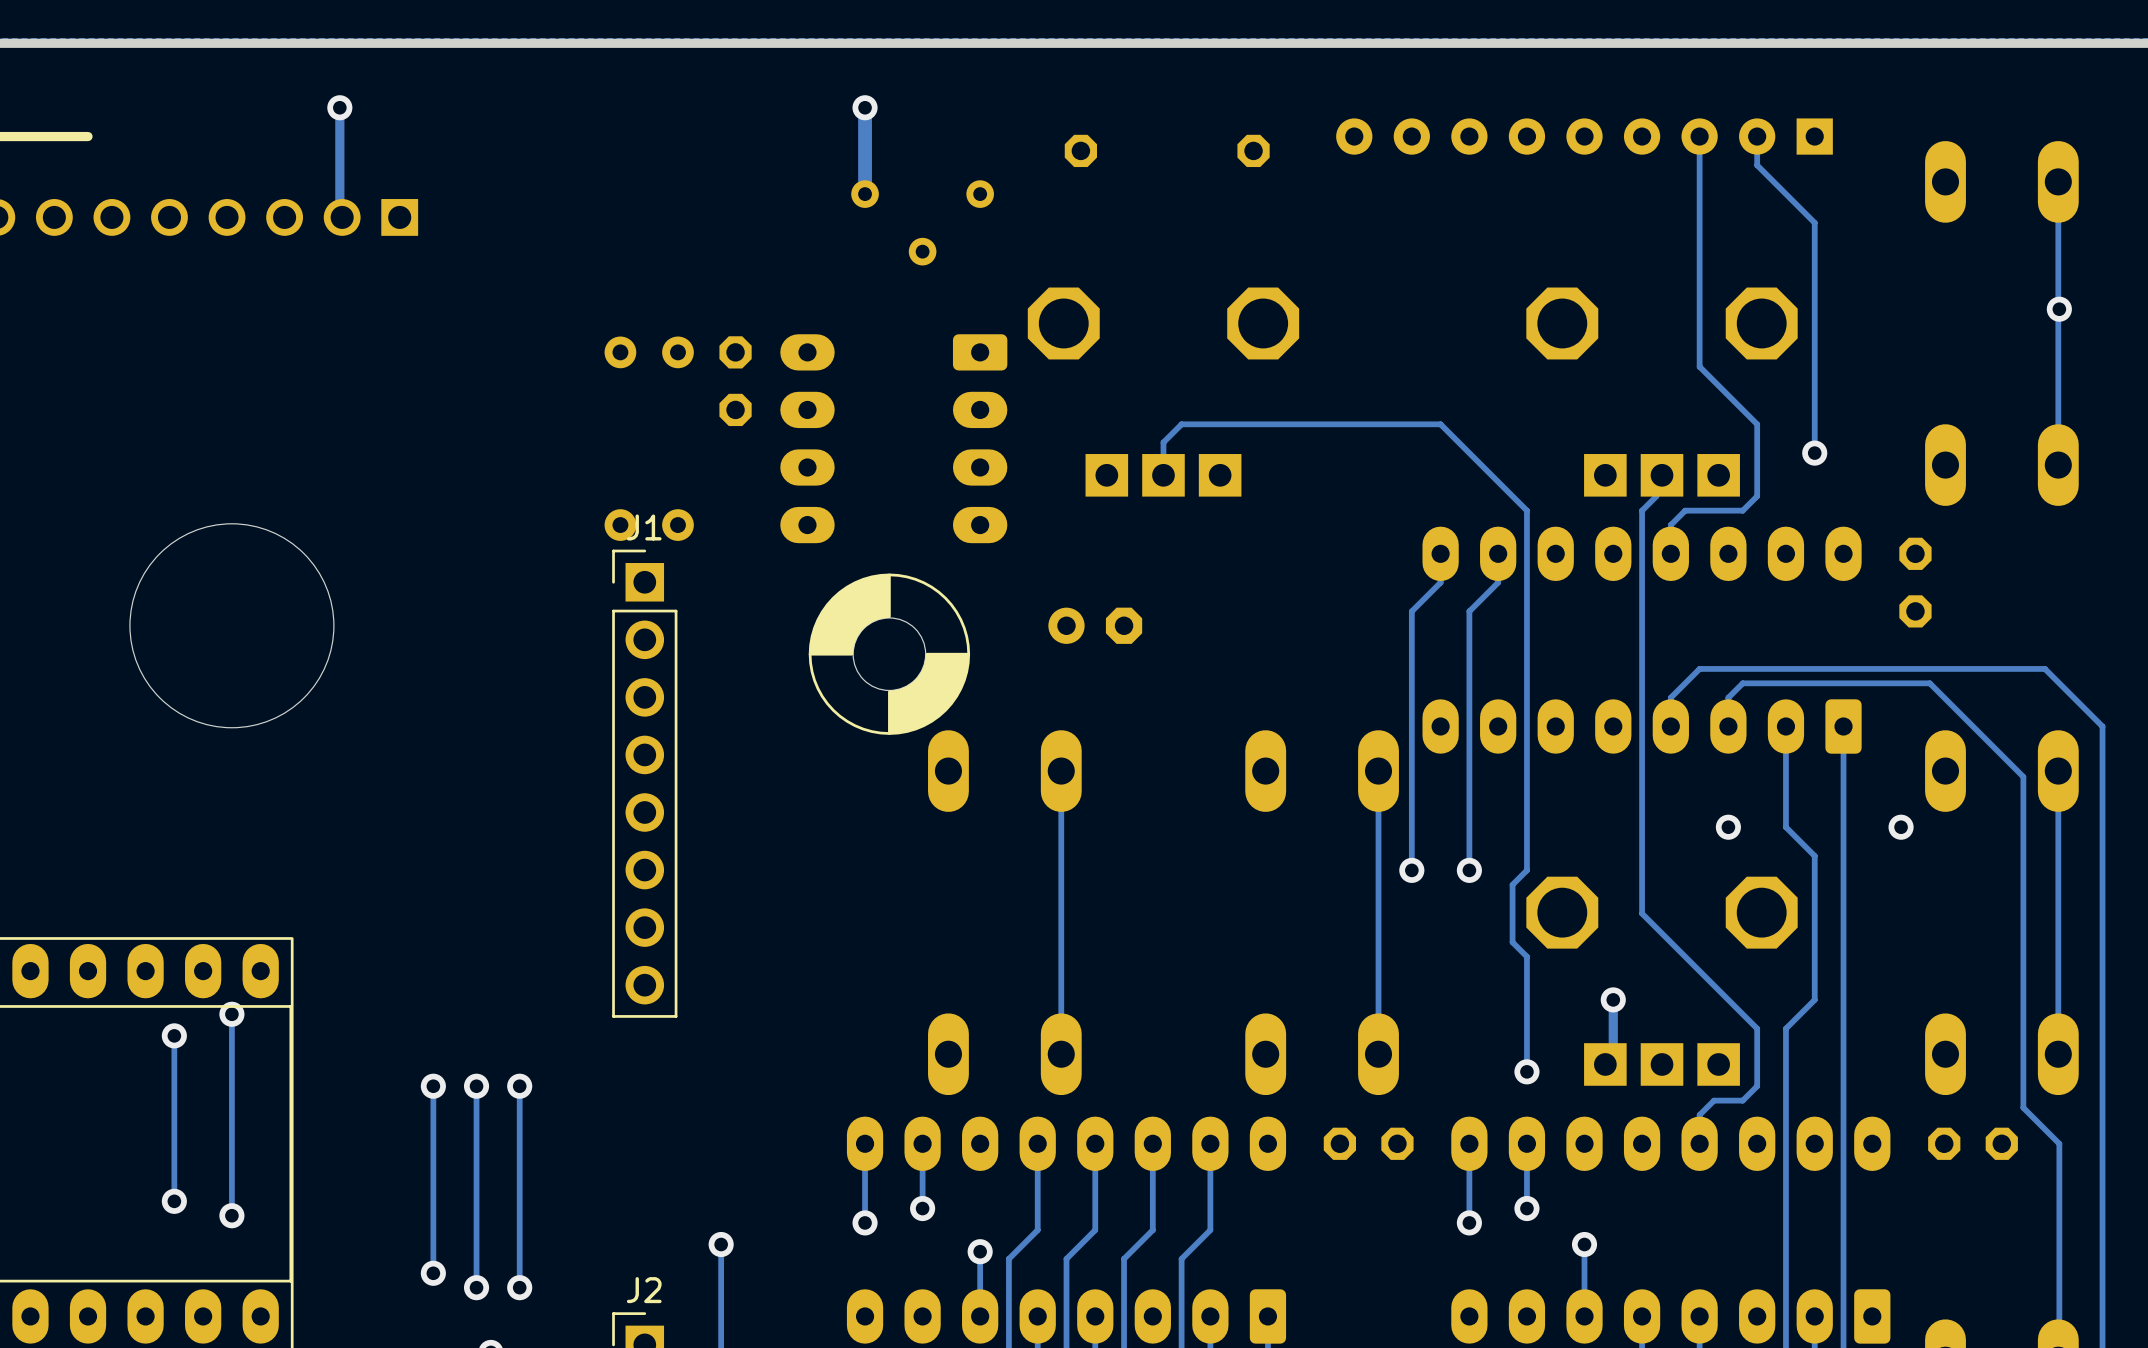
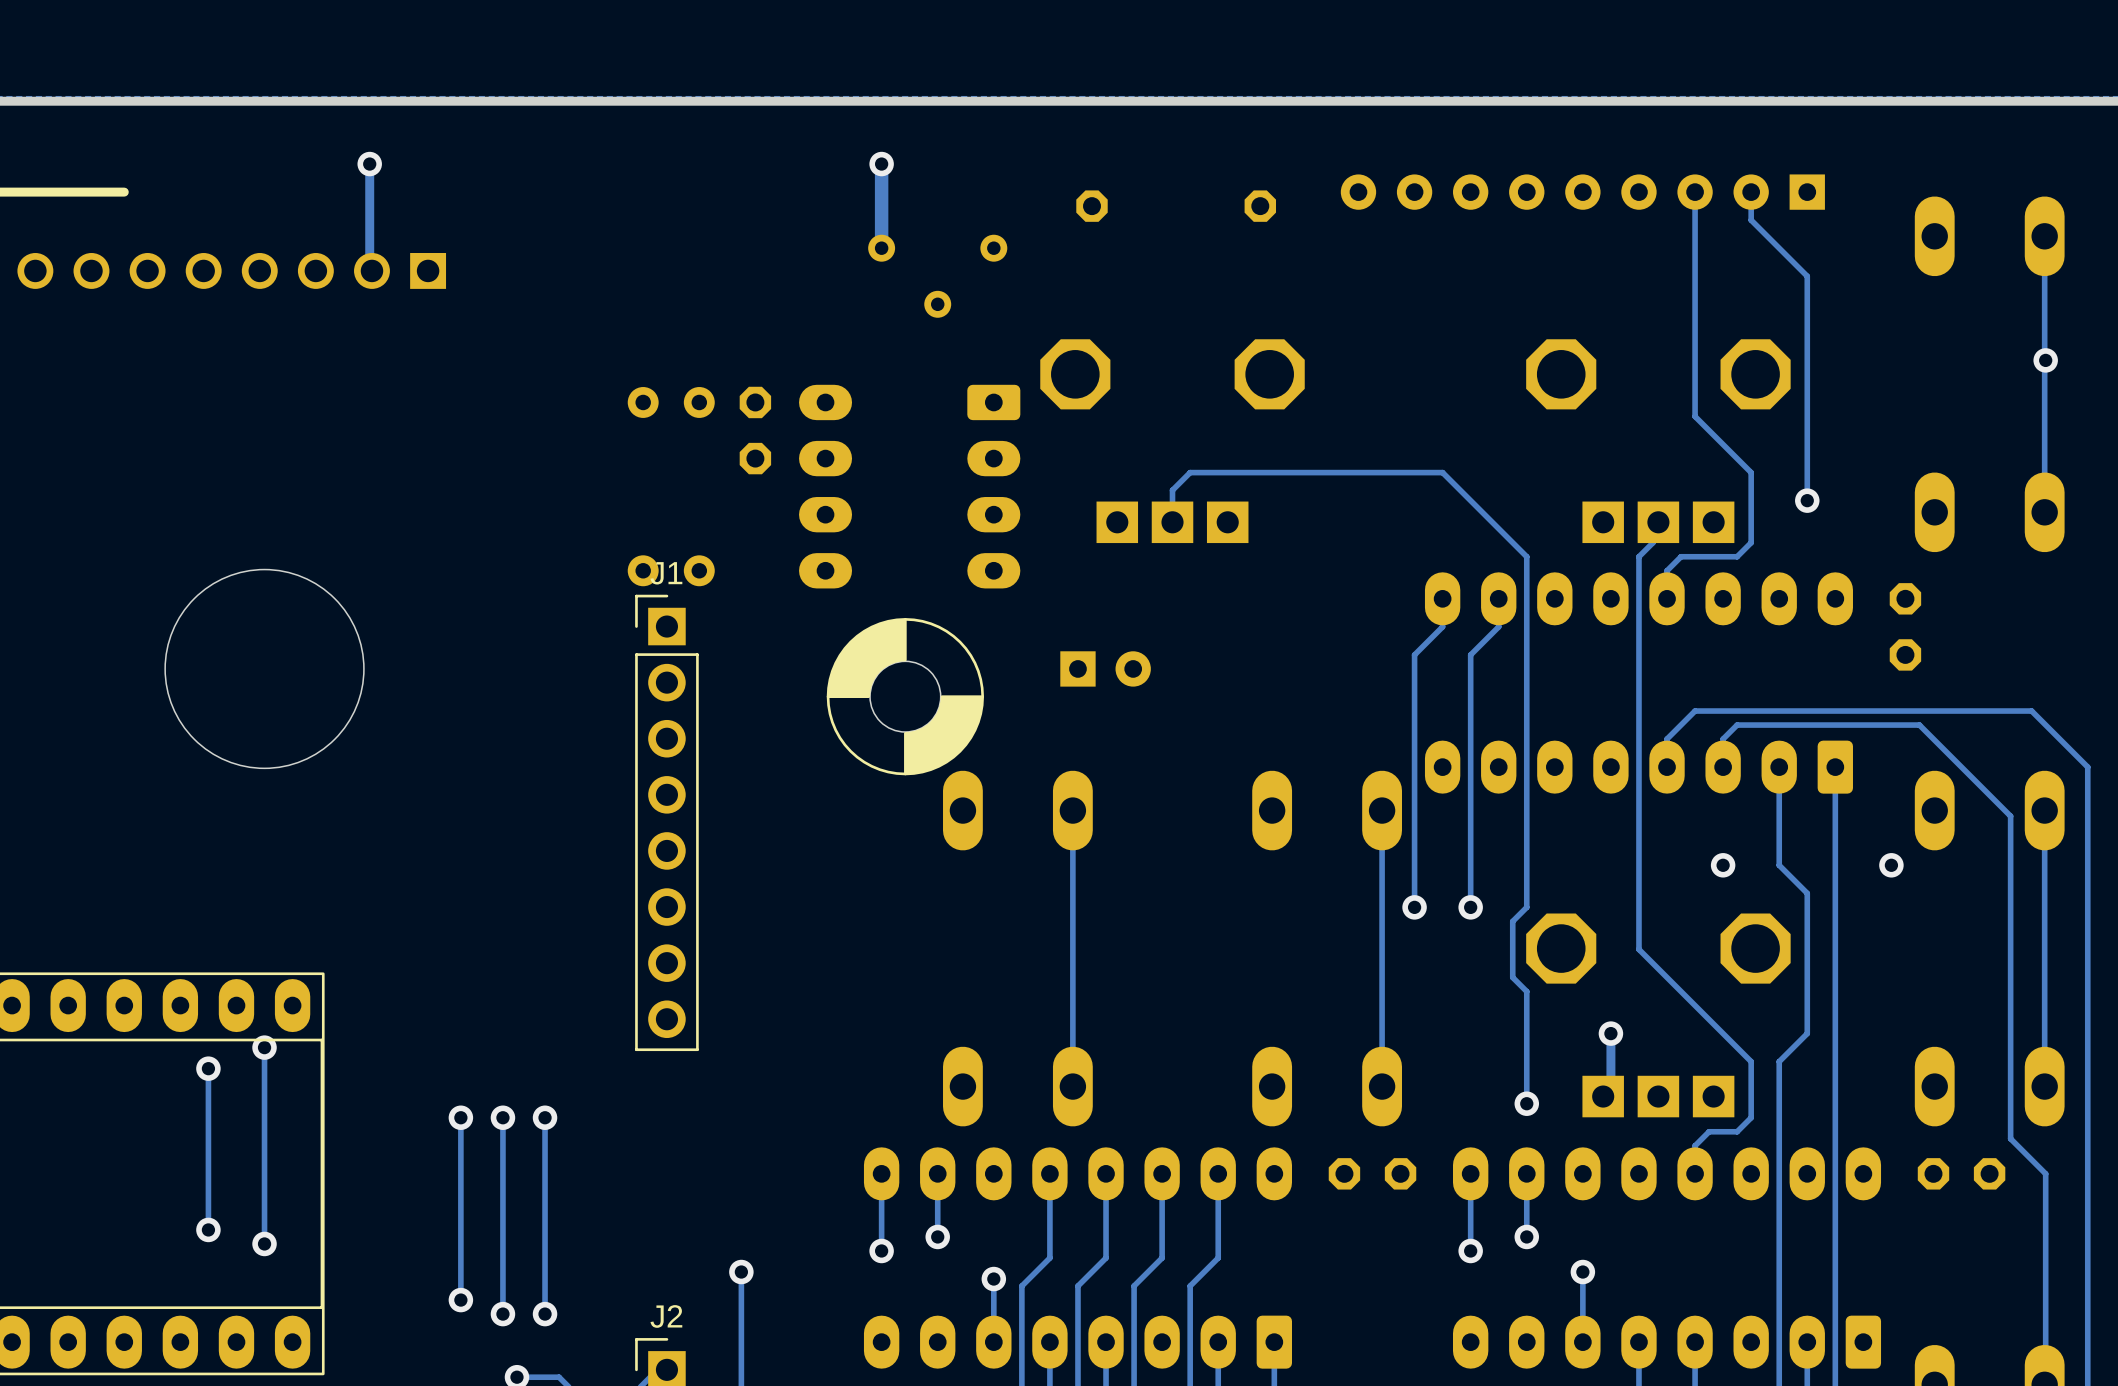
part footprint: [1048, 607, 1143, 644] -> [1060, 651, 1151, 687]

